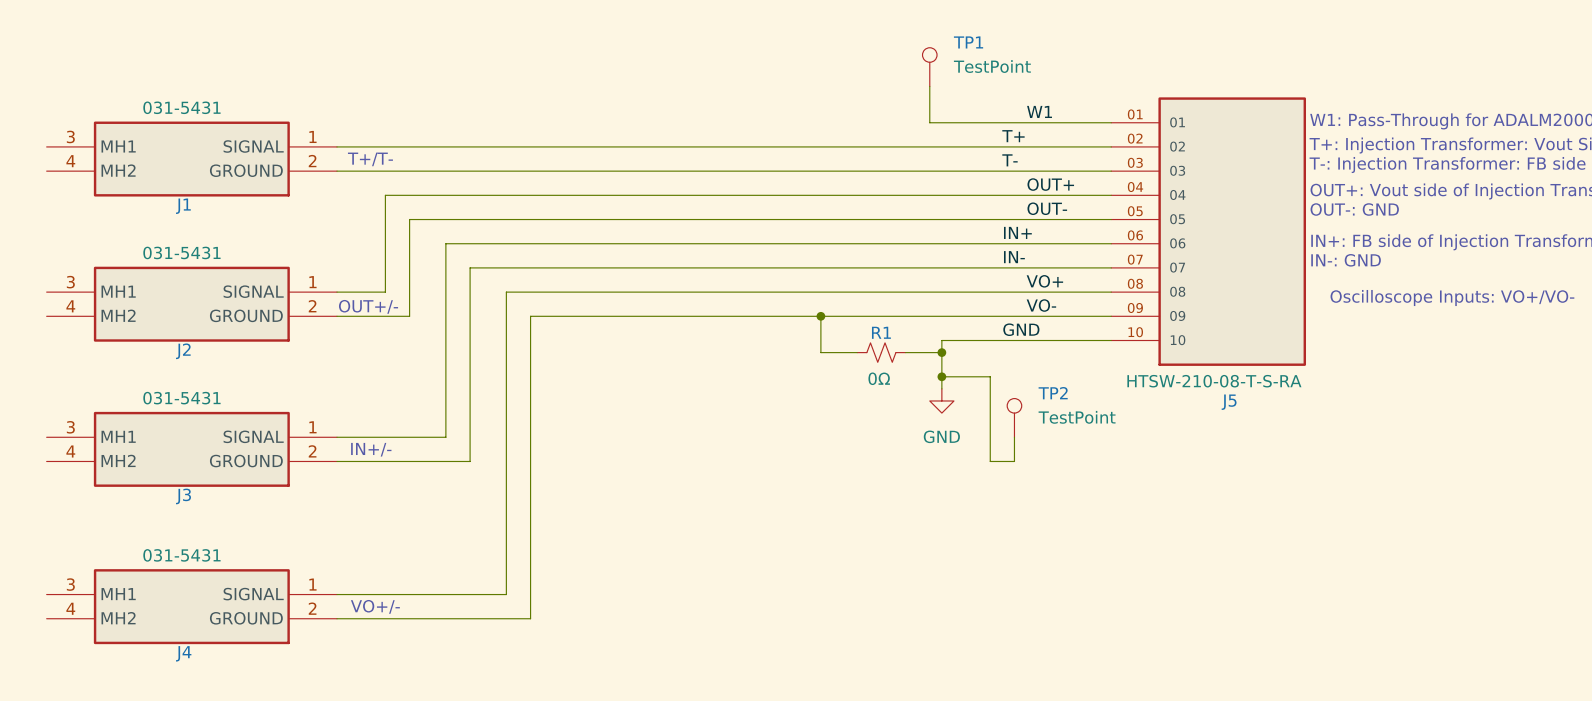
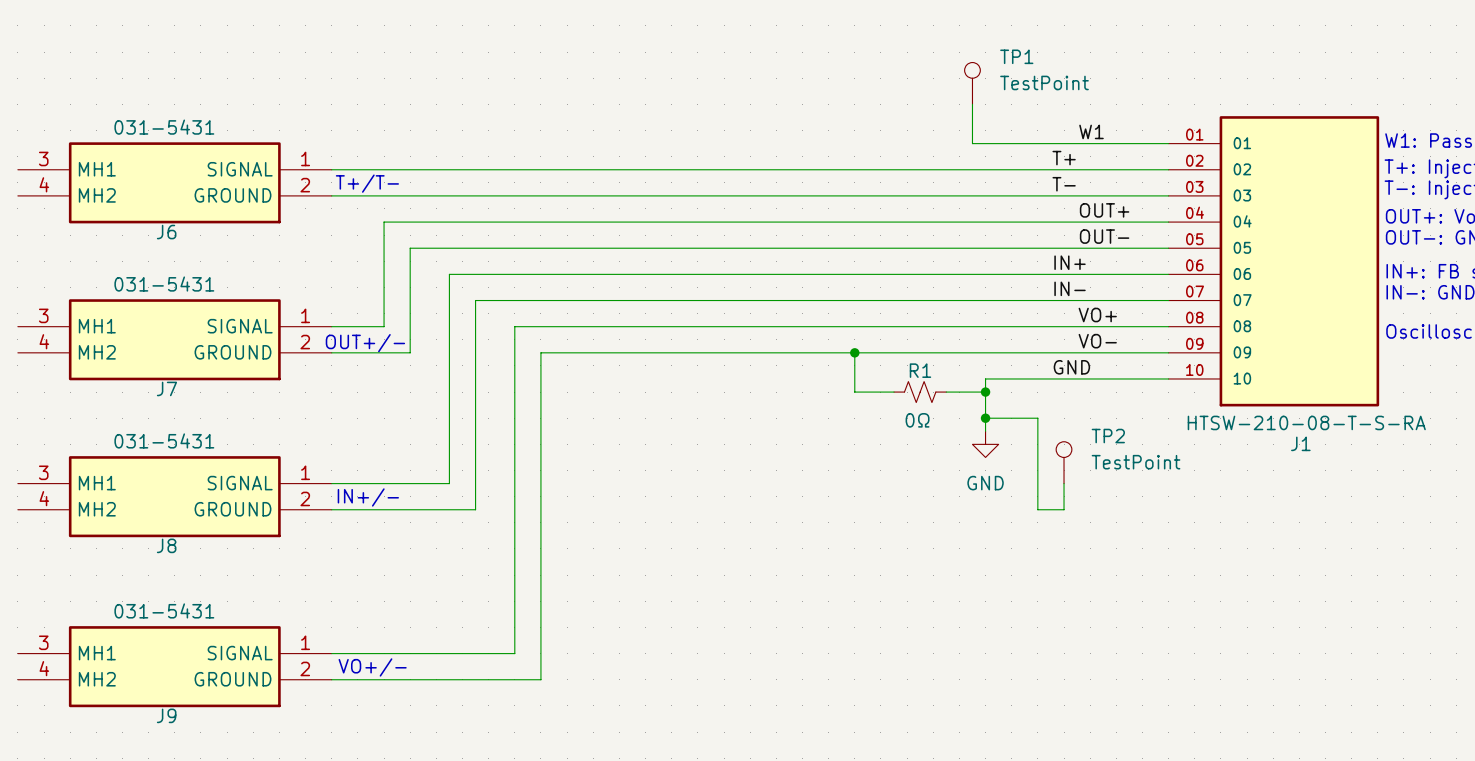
J1 name: J1 (183, 206) -> J6 (166, 232)
J2 name: J2 (183, 351) -> J7 (166, 388)
J5 name: J5 (1229, 402) -> J1 (1300, 443)
J3 name: J3 (183, 496) -> J8 (166, 545)
J4 name: J4 (183, 653) -> J9 (166, 715)

